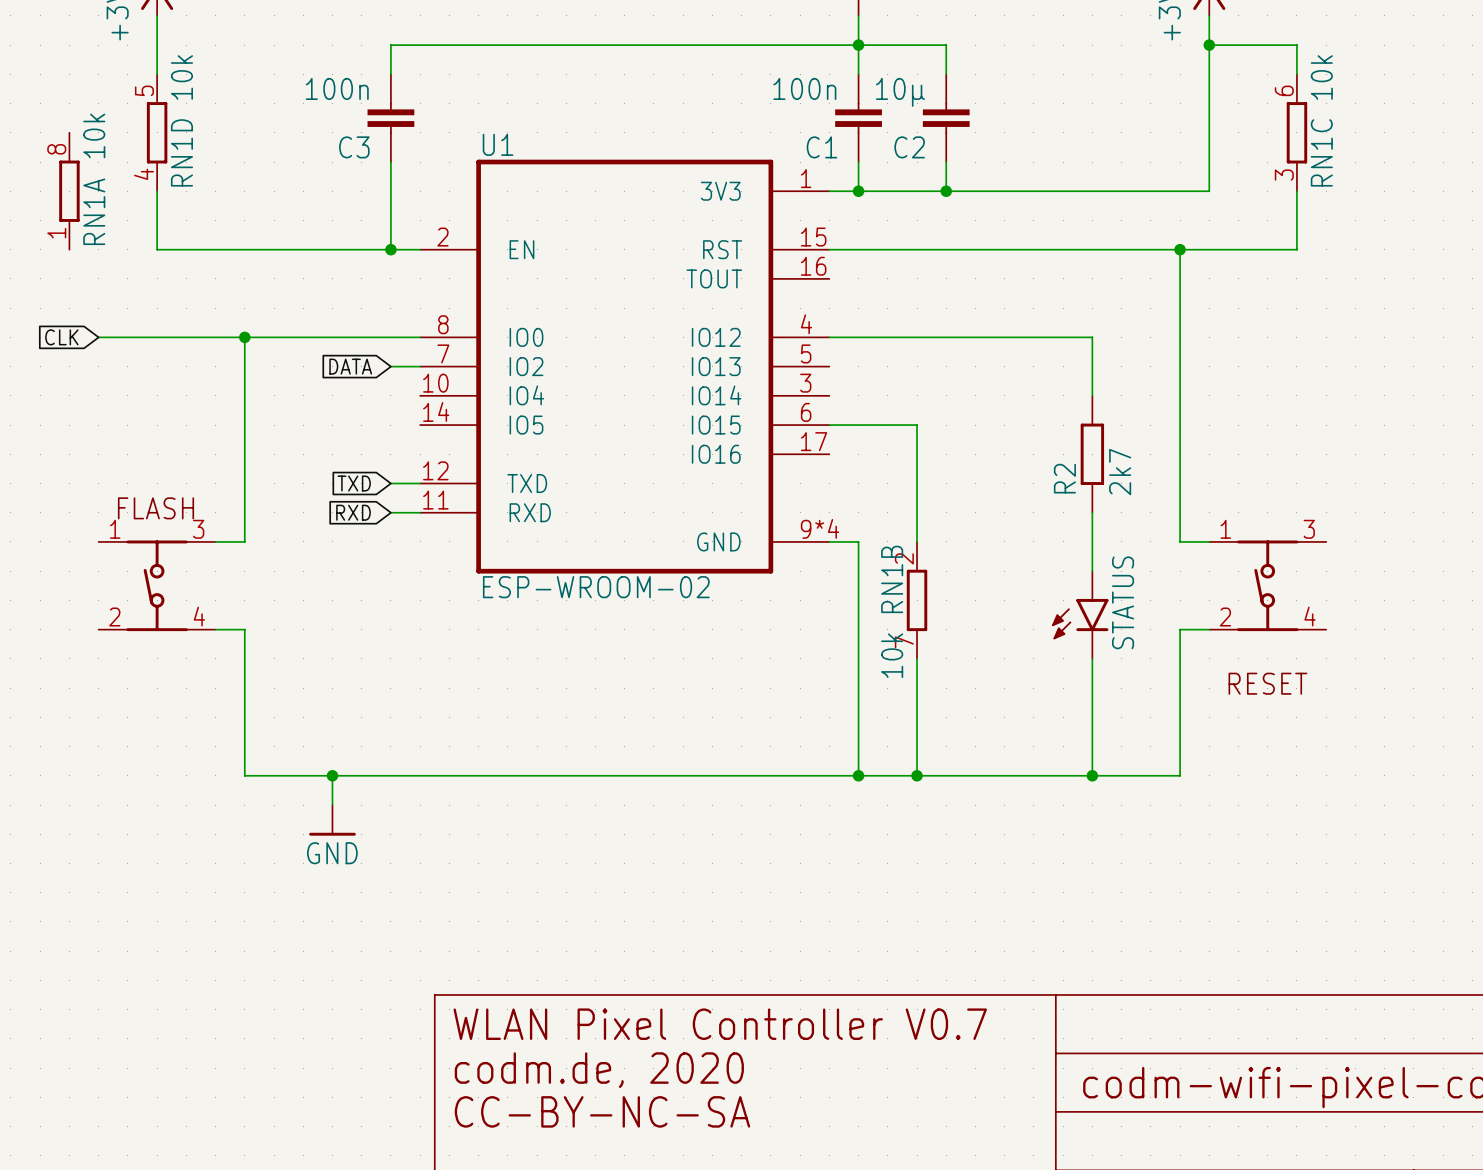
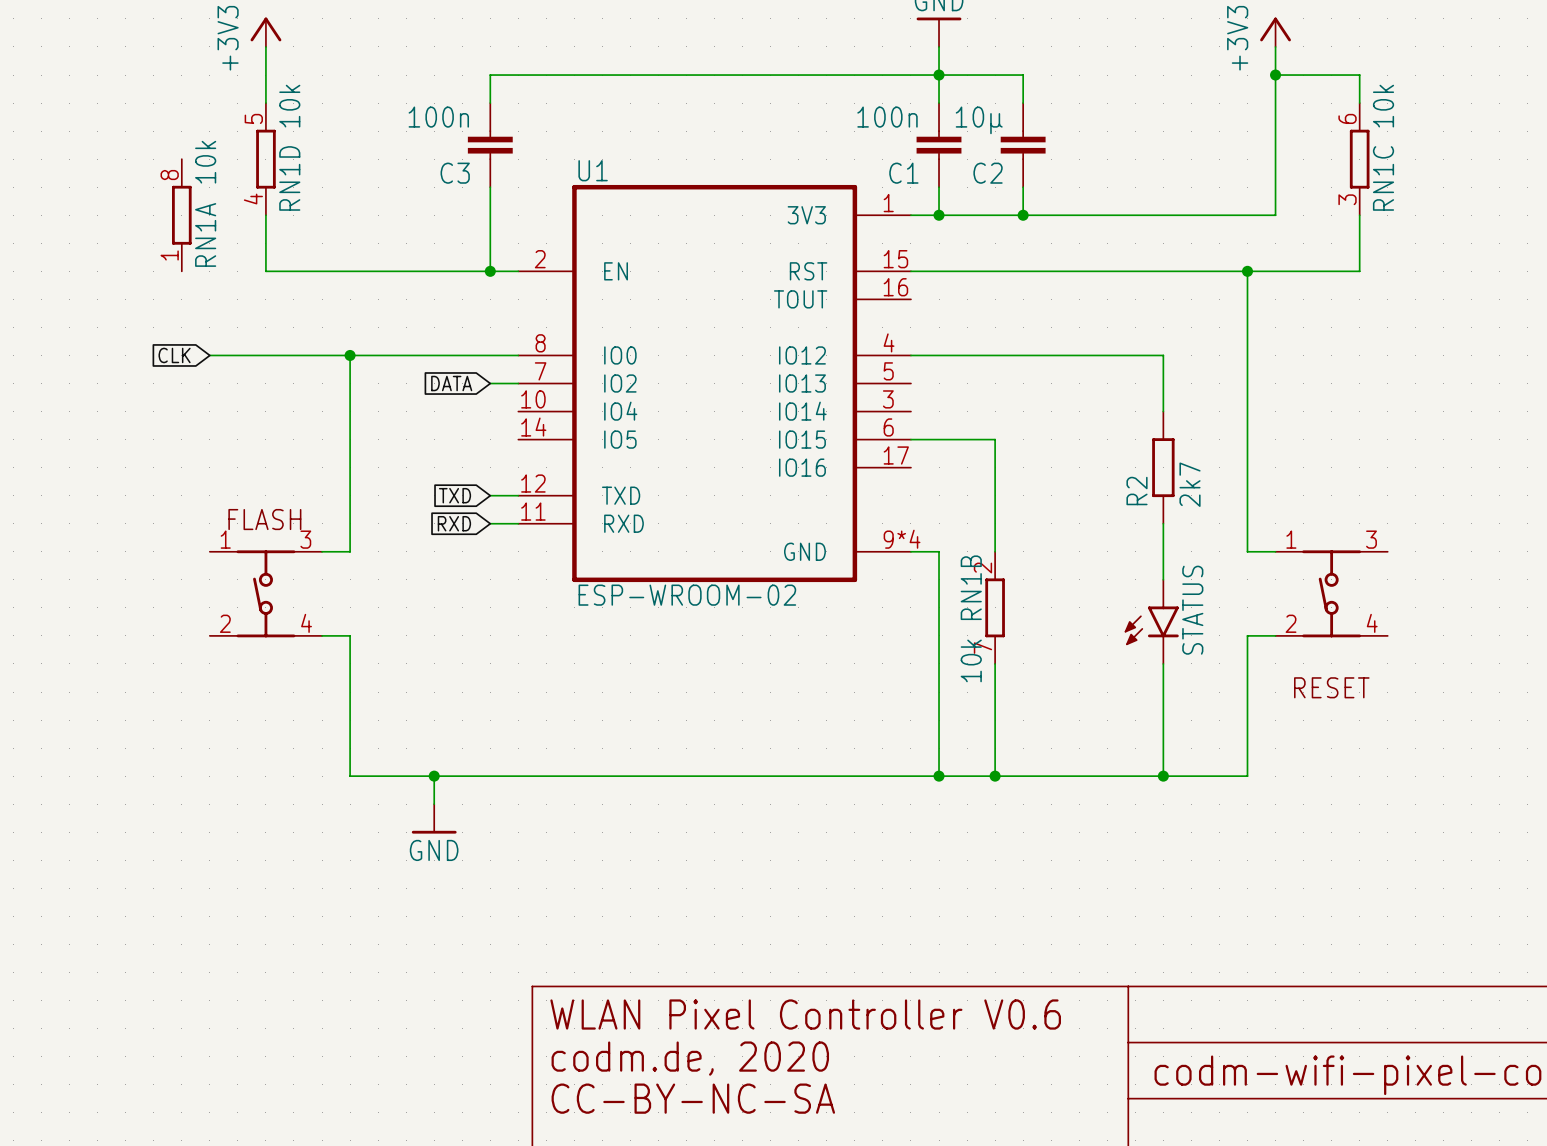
text: WLAN Pixel Controller V0.7 (720, 1024) -> WLAN Pixel Controller V0.6 (805, 1014)

